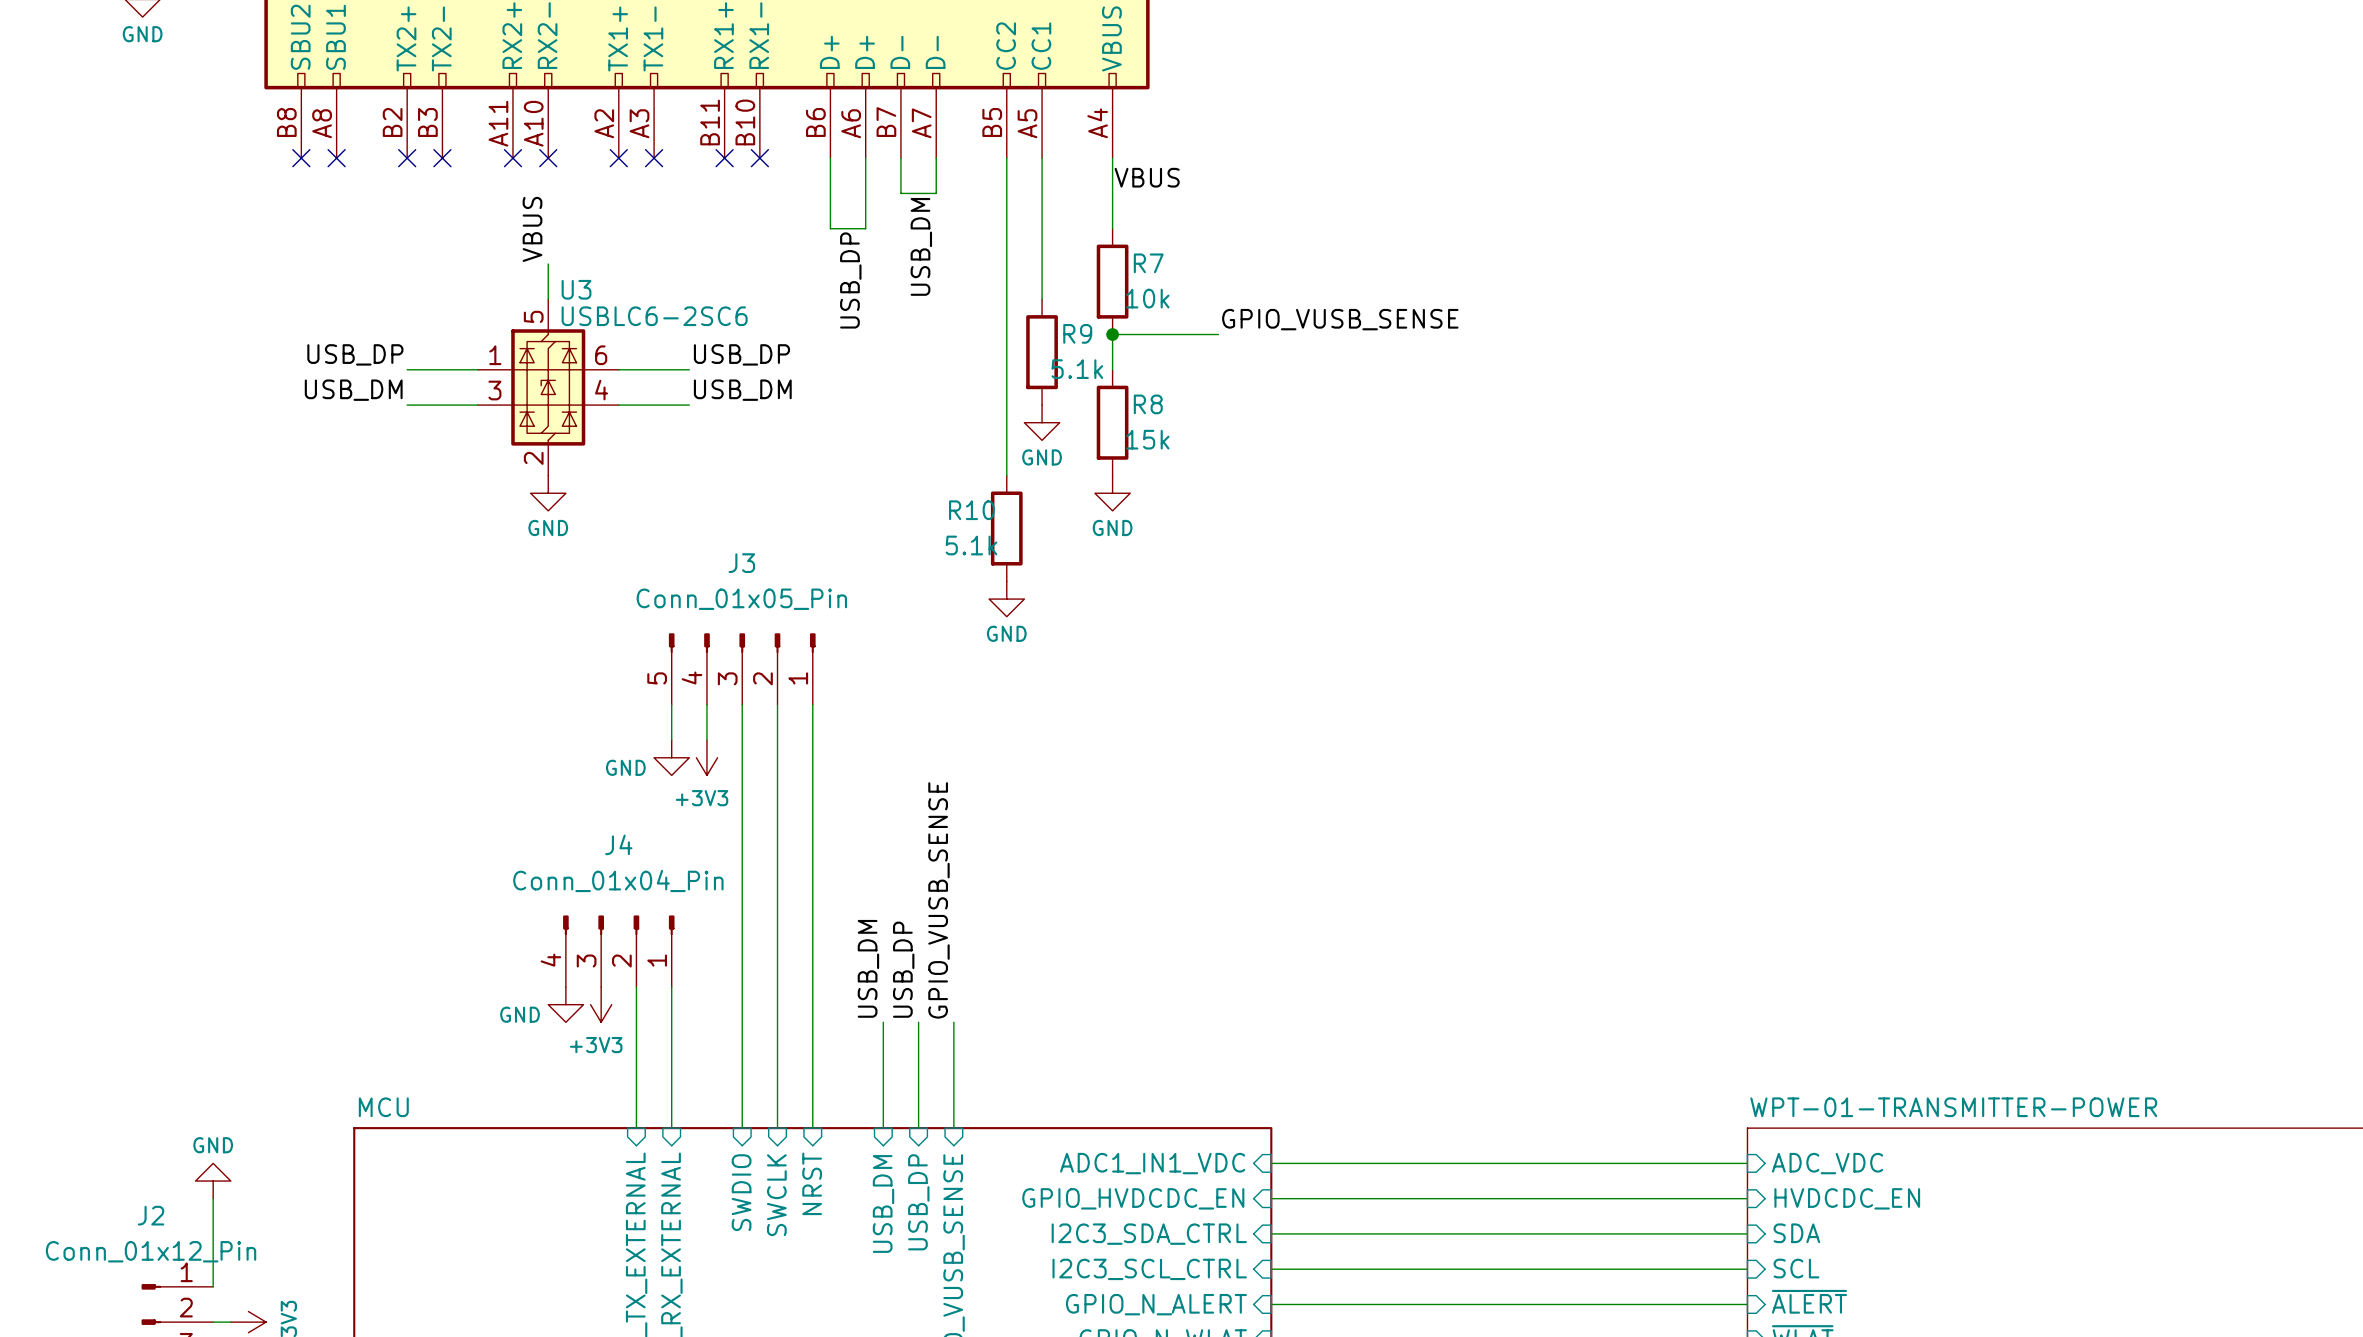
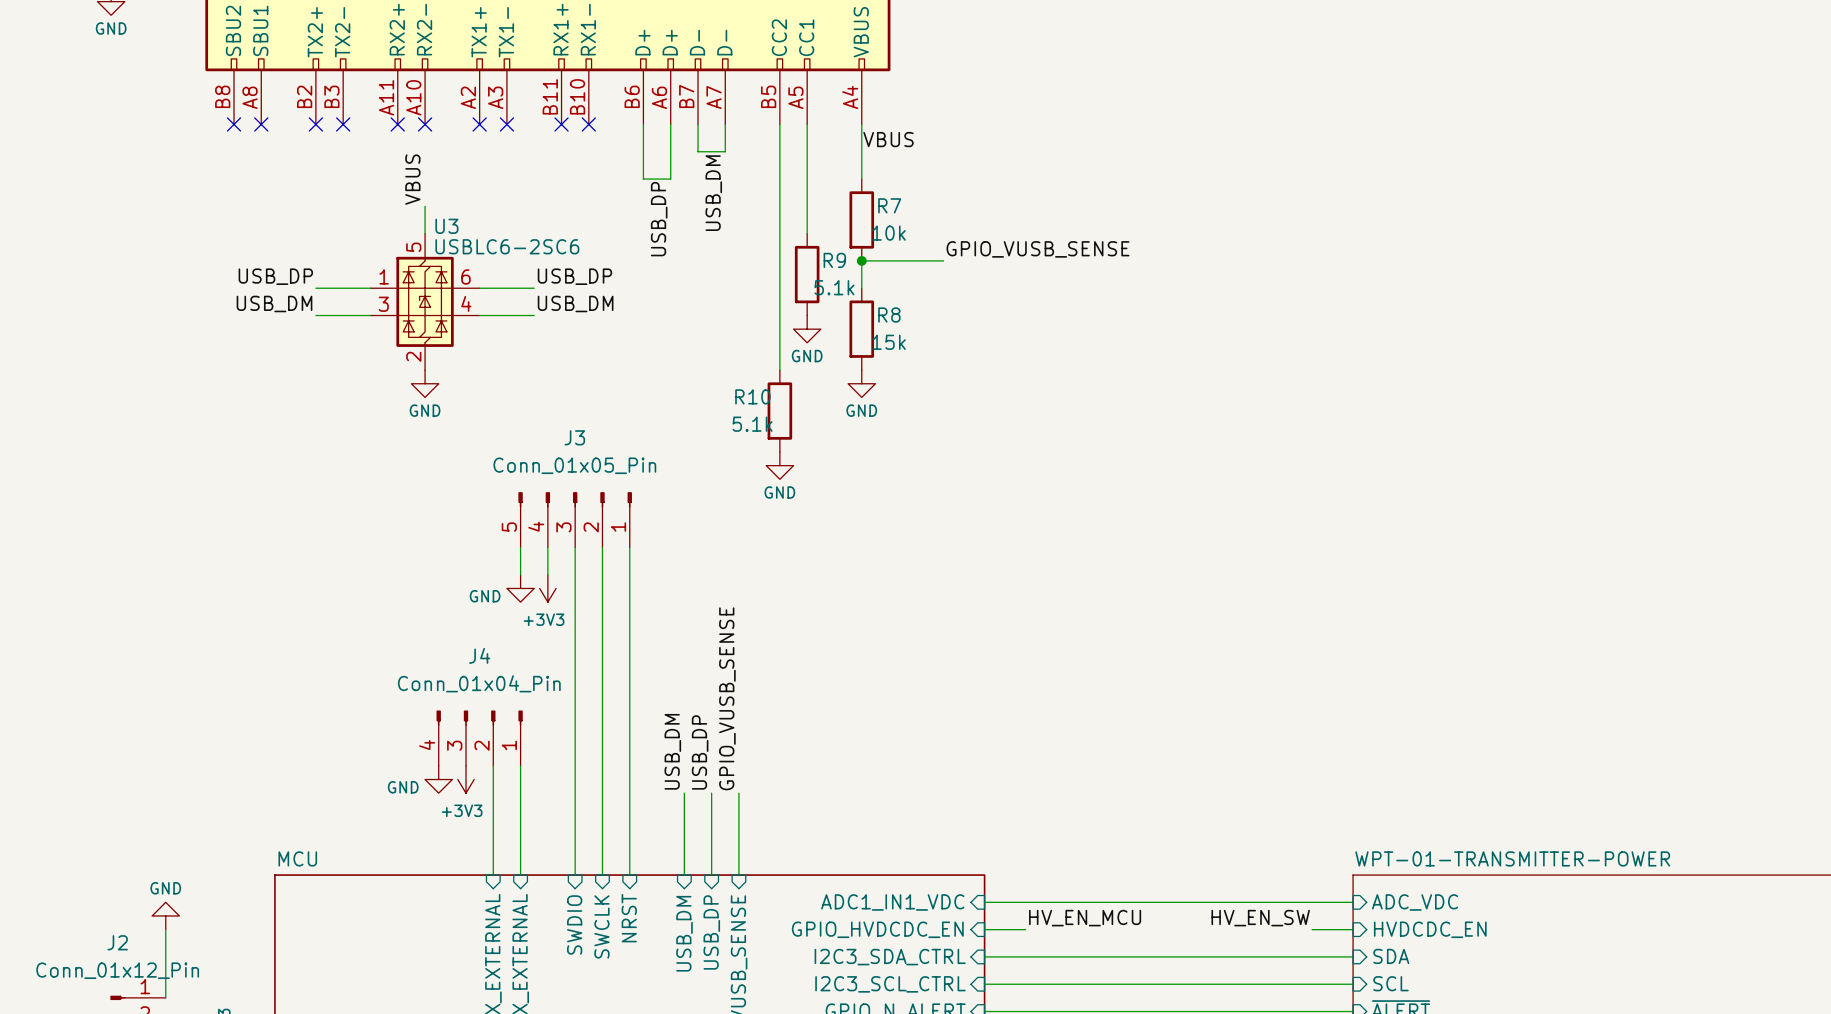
label: none -> HV_EN_MCU (1085, 918)
label: none -> HV_EN_SW (1260, 918)
wire: (1324, 1198) (1694, 1198) -> none

